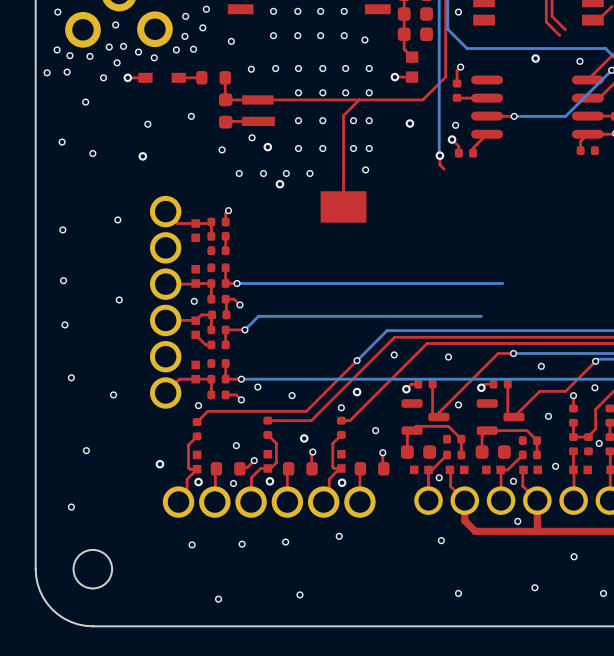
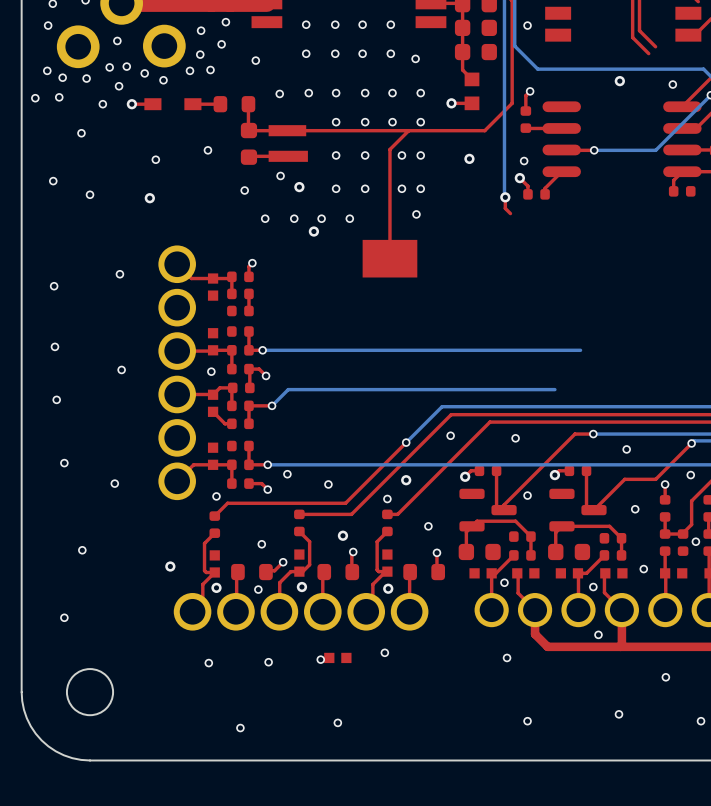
part: none -> (337, 657)

